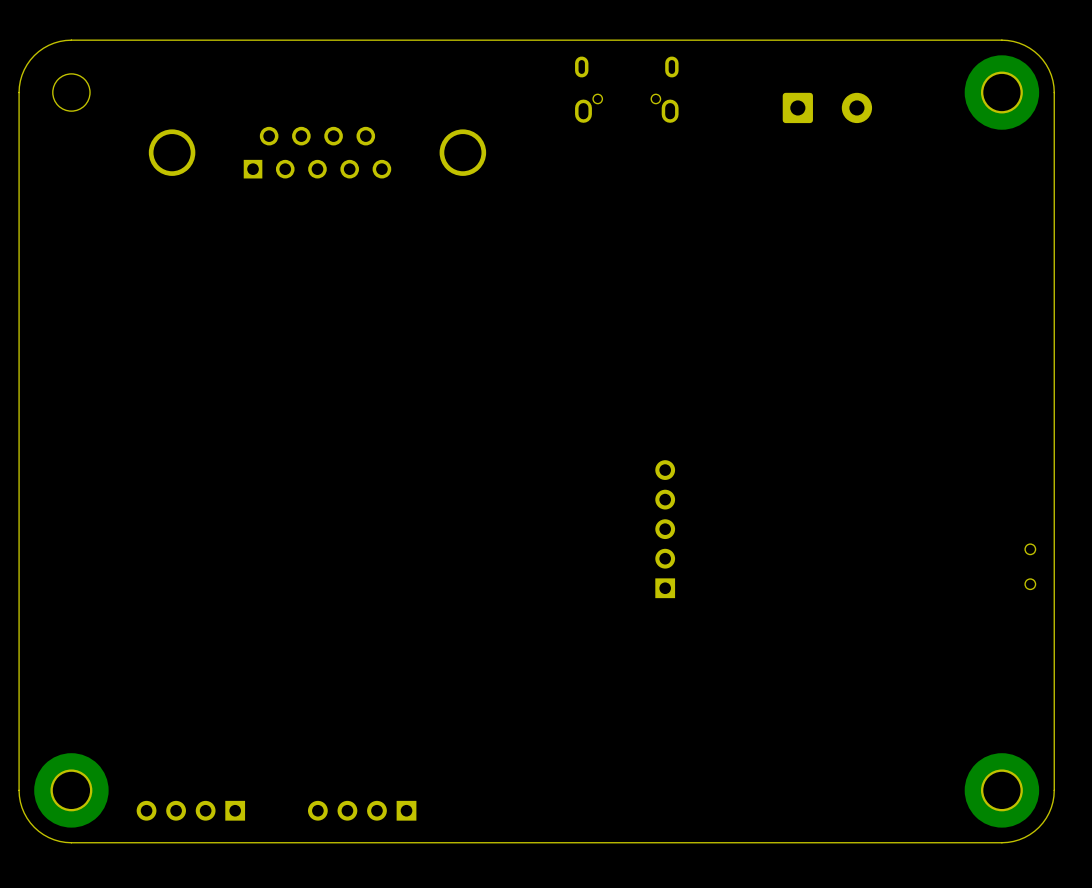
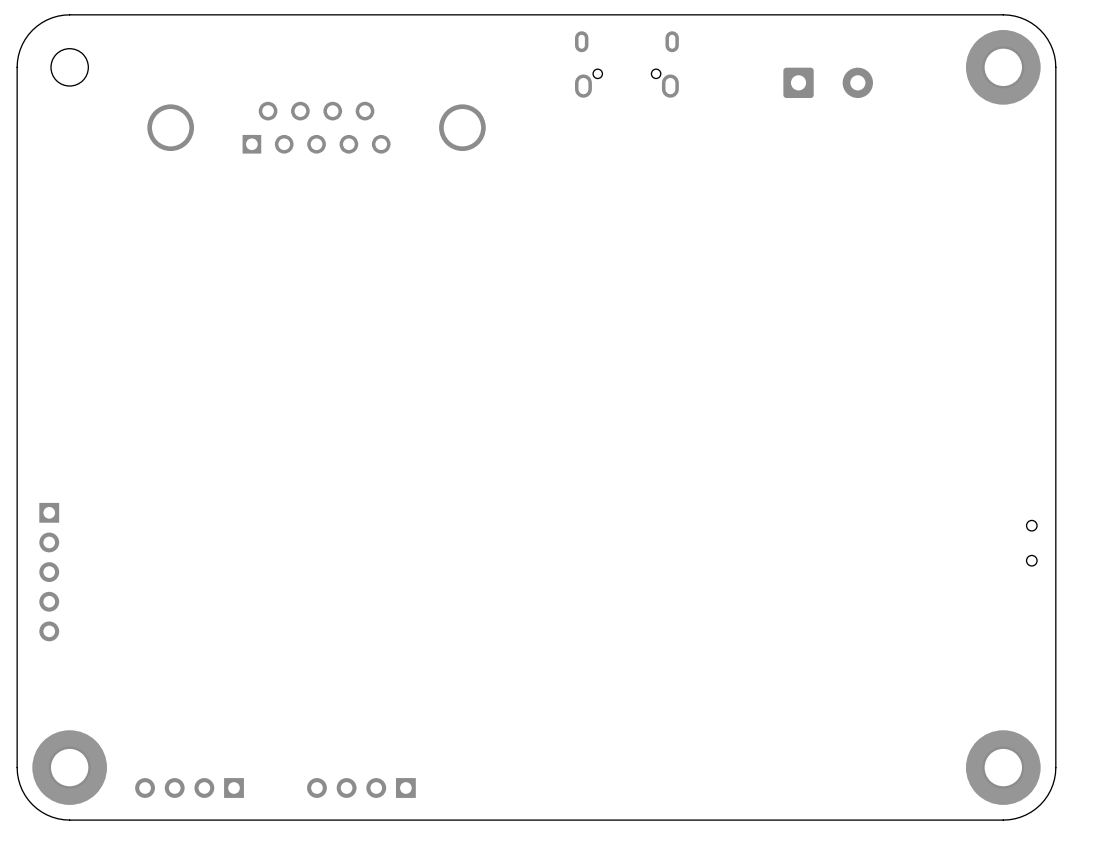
part: (665, 529) -> none
part: none -> (49, 572)

